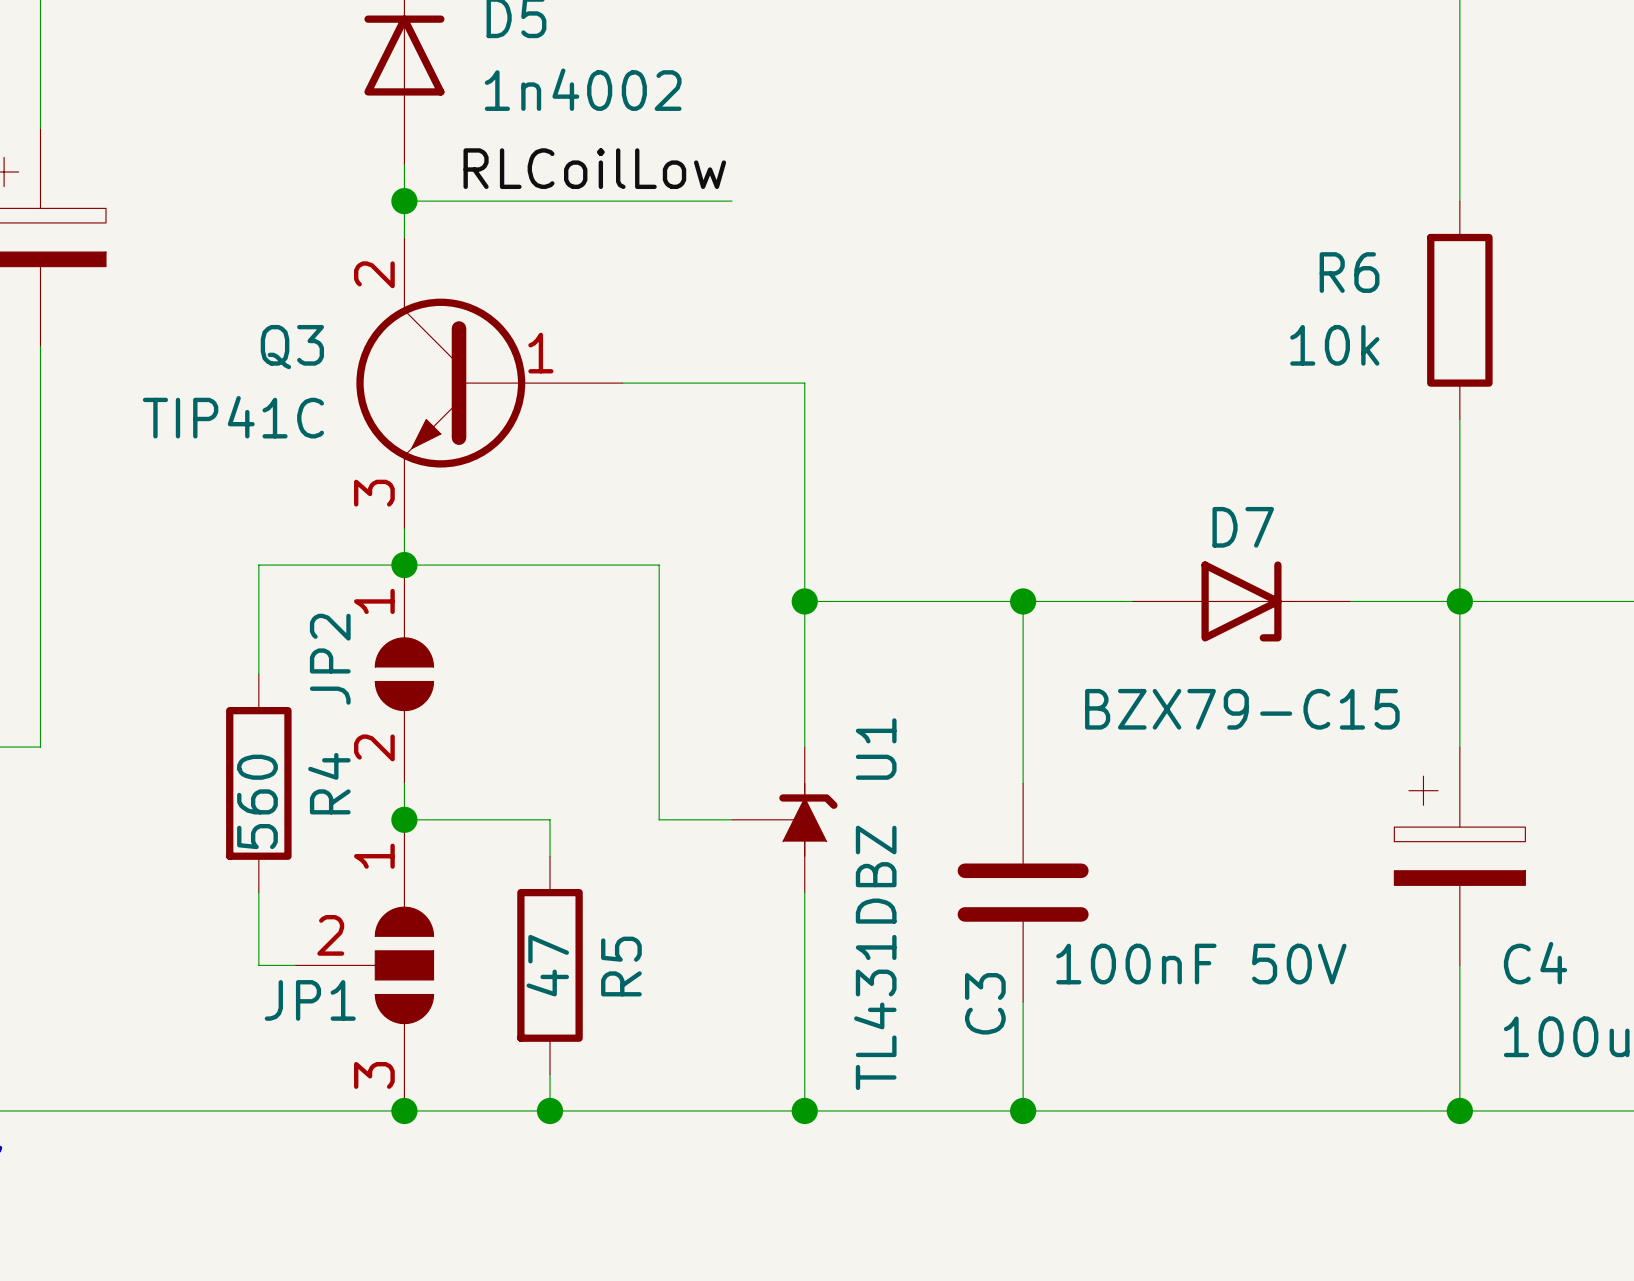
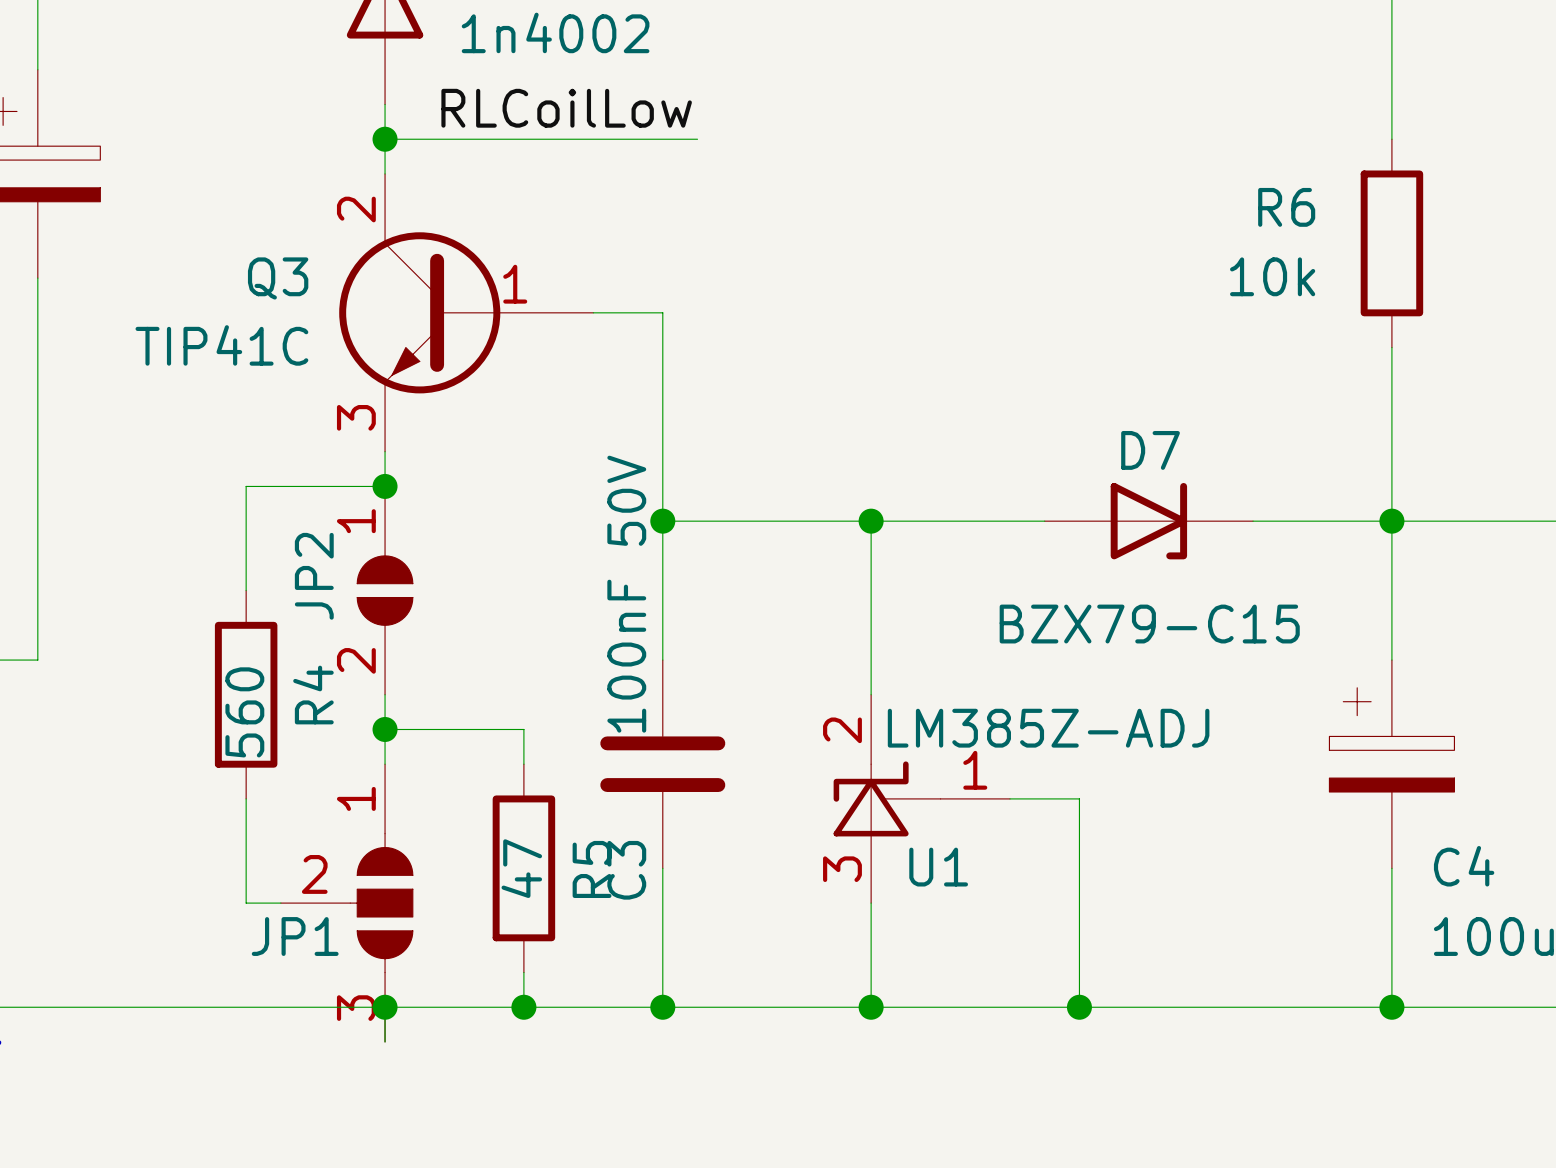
wire: (695, 383) (804, 383) (804, 747) -> (662, 312) (662, 660)
wire: (404, 565) (659, 565) (659, 819) (731, 819) -> none
wire: none -> (662, 521) (766, 521)
junction: none -> (662, 521)
junction: (804, 601) -> none
junction: none -> (871, 521)
wire: (1023, 601) (1023, 783) -> (871, 521) (871, 694)
junction: (1023, 601) -> none
D7 position: (1241, 601) -> (1148, 521)
U1 symbol: [731, 747, 838, 893] -> [833, 694, 1011, 904]
U1 name position: U1 (876, 749) -> U1 (938, 867)
wire: (804, 892) (804, 1110) -> none
C3 position: (1023, 892) -> (662, 764)
wire: none -> (1010, 798) (1079, 798) (1079, 1007)
U1 value: TL431DBZ (875, 957) -> LM385Z-ADJ (1048, 728)
C3 value rotation: 0° (1201, 964) -> 90° counterclockwise (626, 594)
wire: (258, 965) (295, 965) -> (246, 868) (246, 903) (280, 903)
JP1 position: (364, 965) -> (346, 903)
wire: none -> (662, 868) (662, 1007)
wire: (1023, 1001) (1023, 1110) -> (871, 903) (871, 1007)
wire: none -> (385, 1007) (385, 1041)
junction: none -> (662, 1007)
junction: (804, 1110) -> none
junction: none -> (871, 1007)
junction: (1023, 1110) -> none
junction: none -> (1079, 1007)

